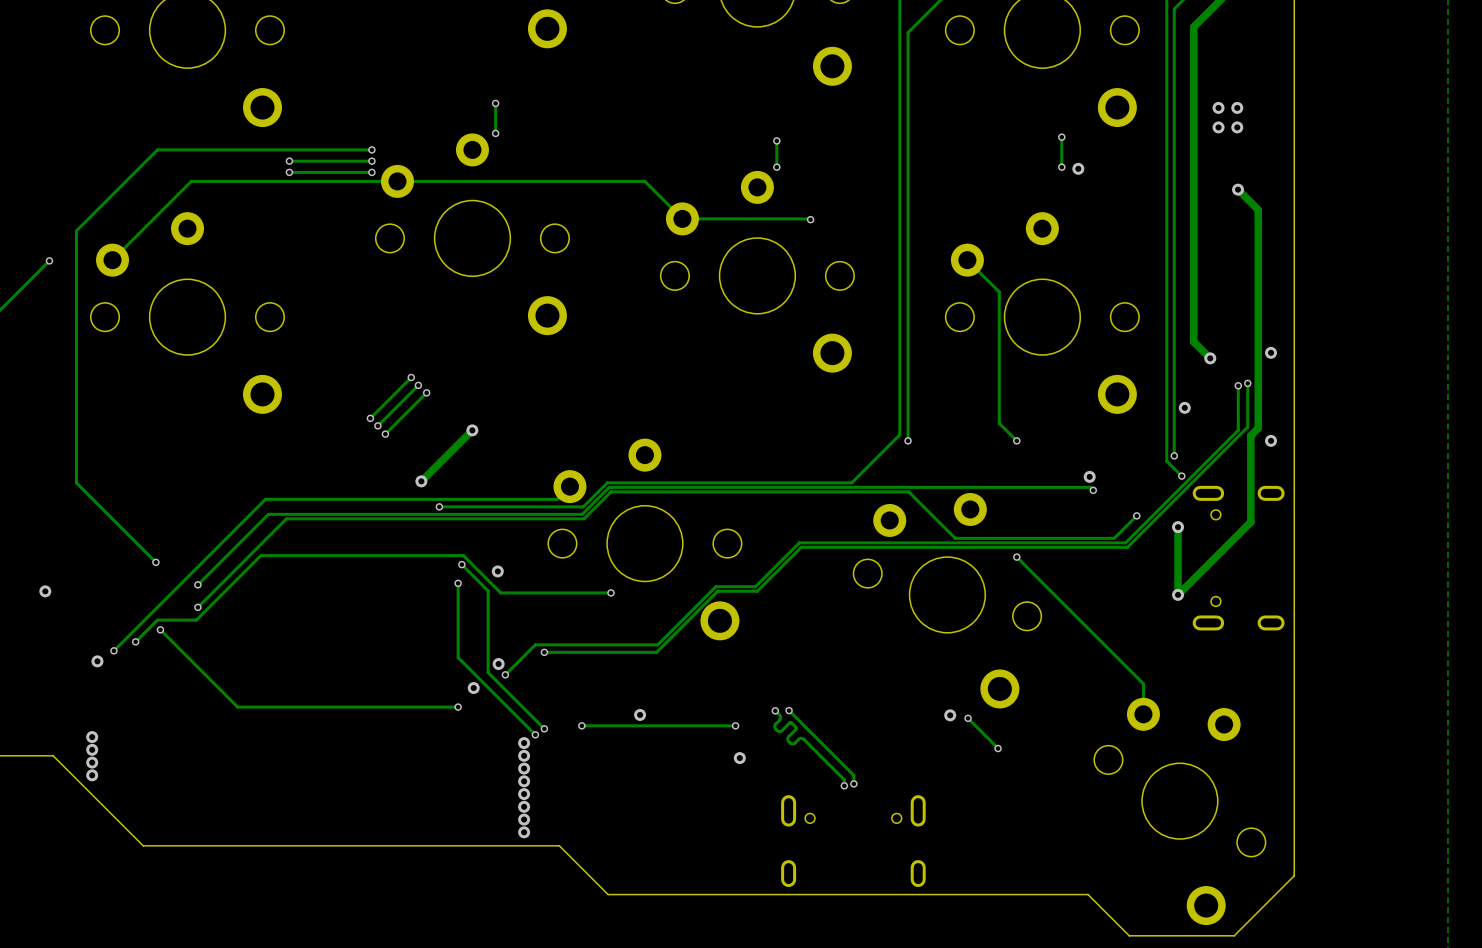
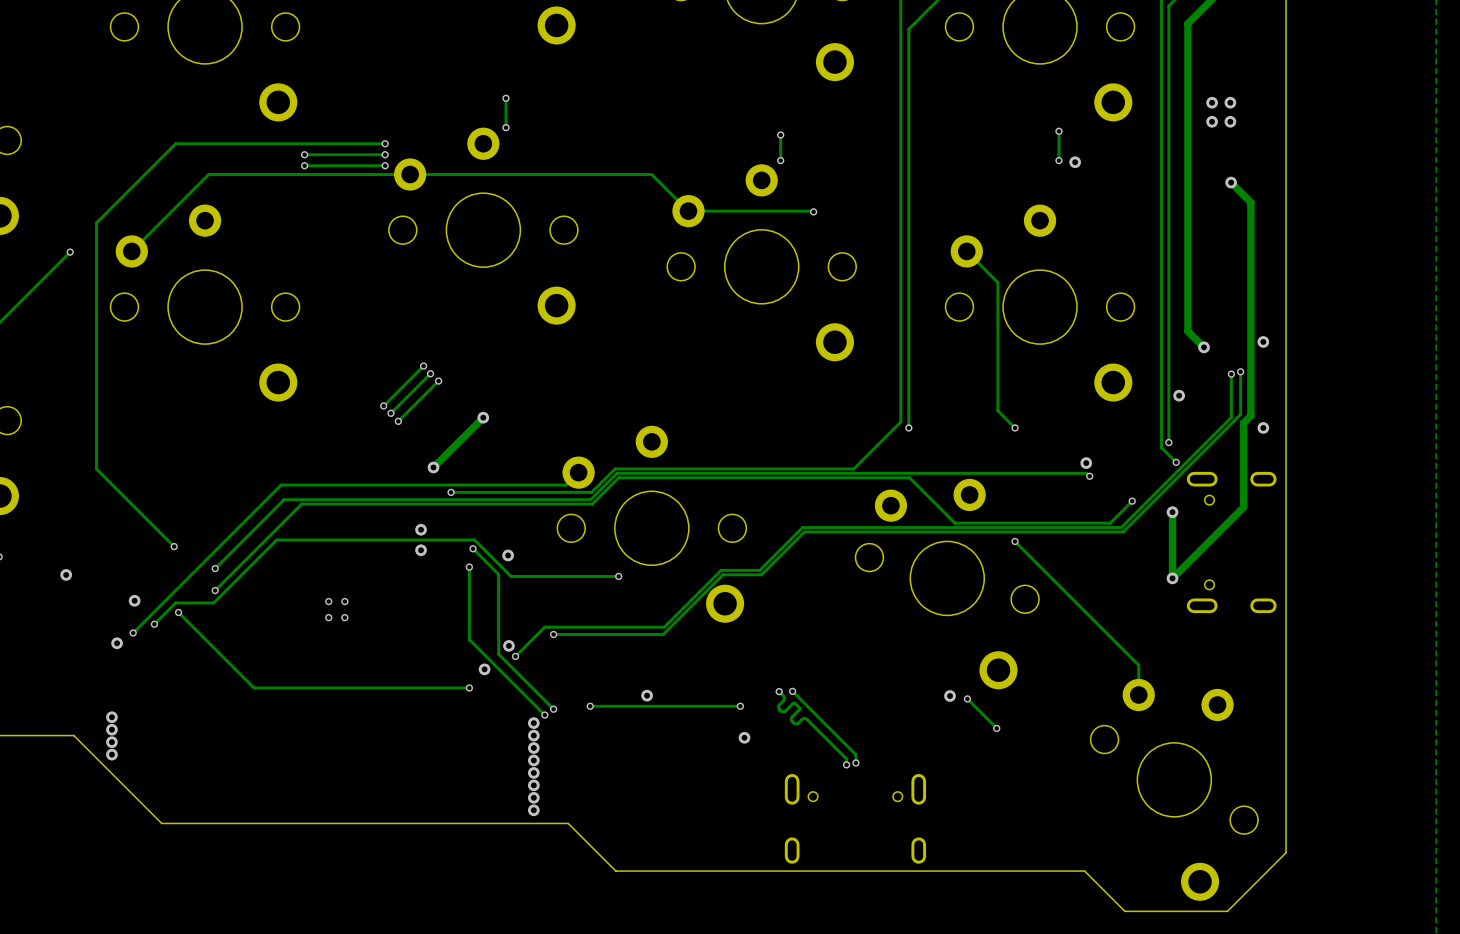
via: none -> (421, 529)
via: none -> (421, 550)
via: none -> (134, 600)
via: none -> (328, 601)
via: none -> (344, 601)
via: none -> (328, 617)
via: none -> (344, 617)

